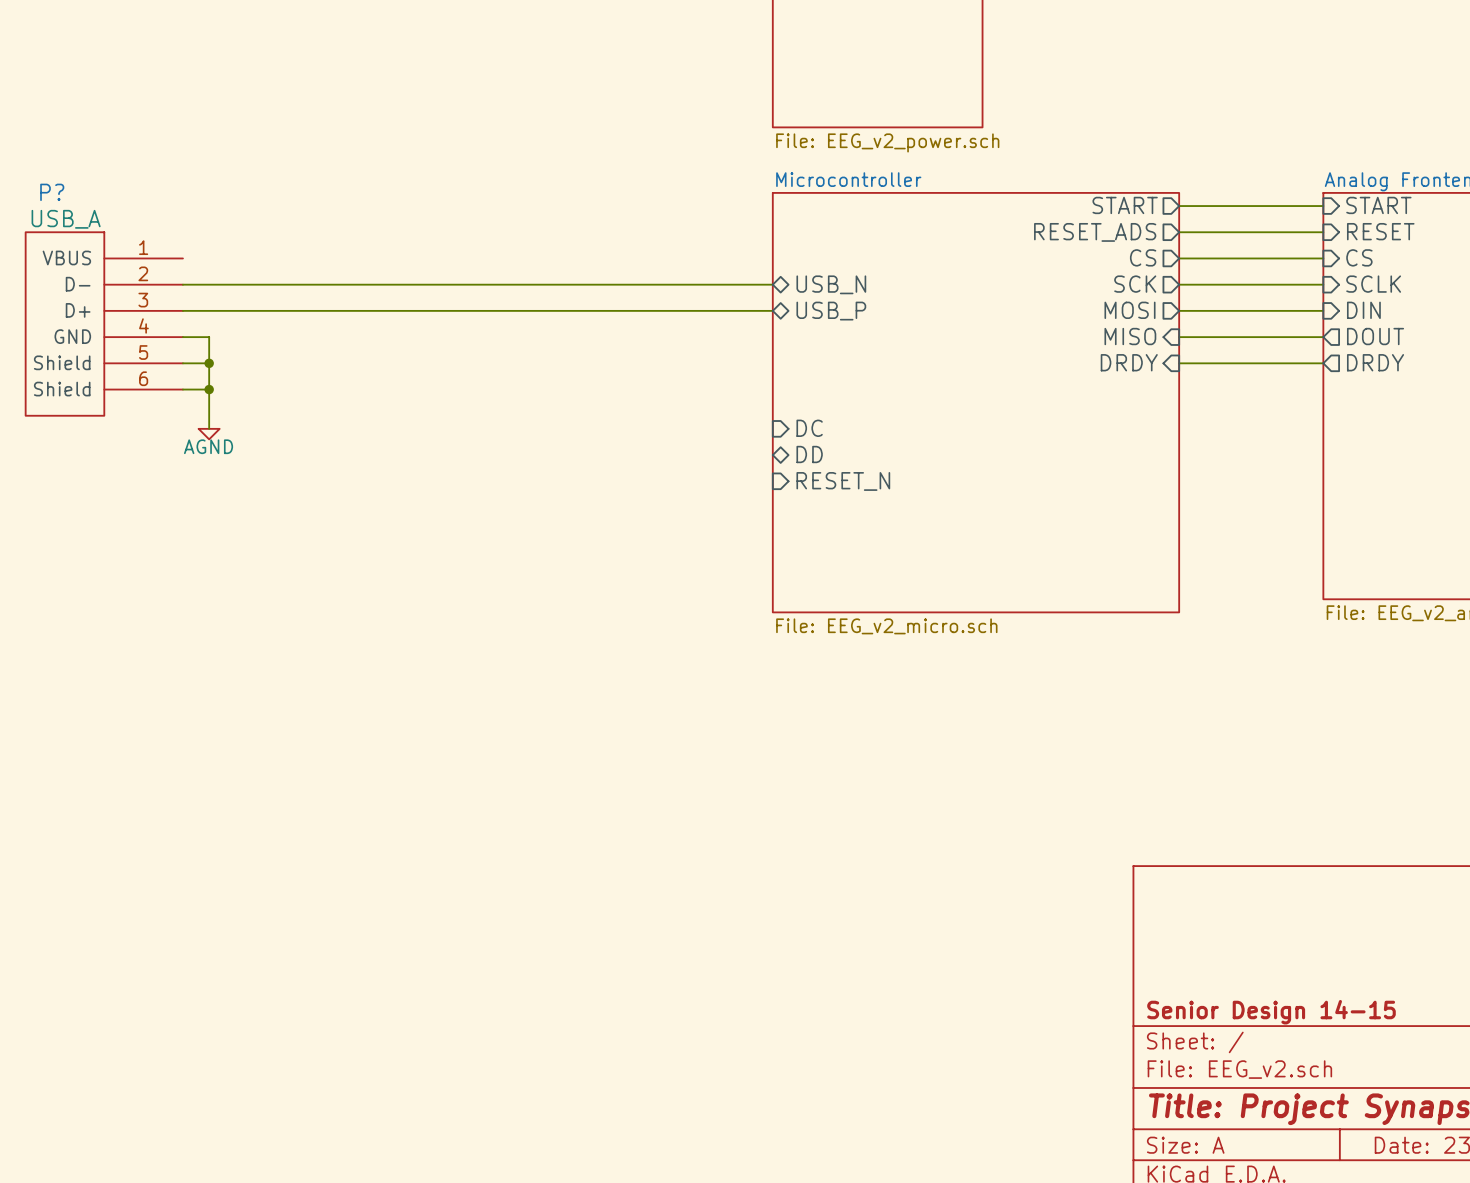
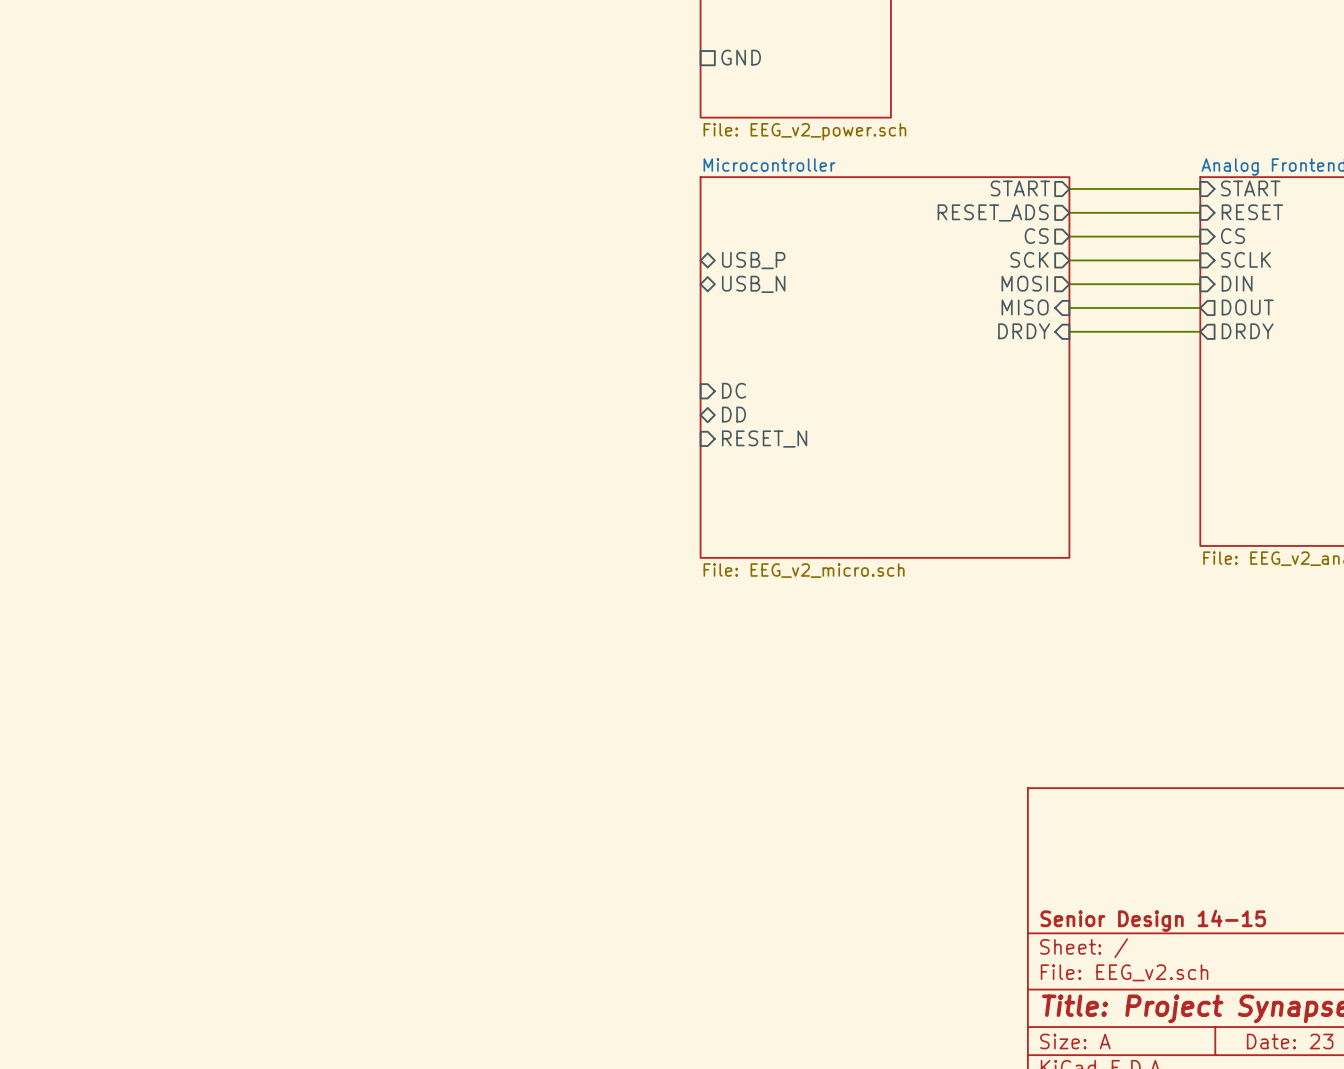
sheet pin: none -> GND (741, 57)
wire: (182, 284) (772, 284) -> none
sheet pin: USB_N (831, 284) -> USB_P (753, 260)
wire: (182, 310) (772, 310) -> none
sheet pin: USB_P (831, 311) -> USB_N (753, 284)
P?: USB_A (104, 324) -> none
wire: (182, 337) (209, 337) (209, 428) -> none
wire: (182, 363) (209, 363) -> none
junction: (209, 363) -> none
wire: (182, 389) (209, 389) -> none
junction: (209, 389) -> none
power symbol: AGND (209, 434) -> none

